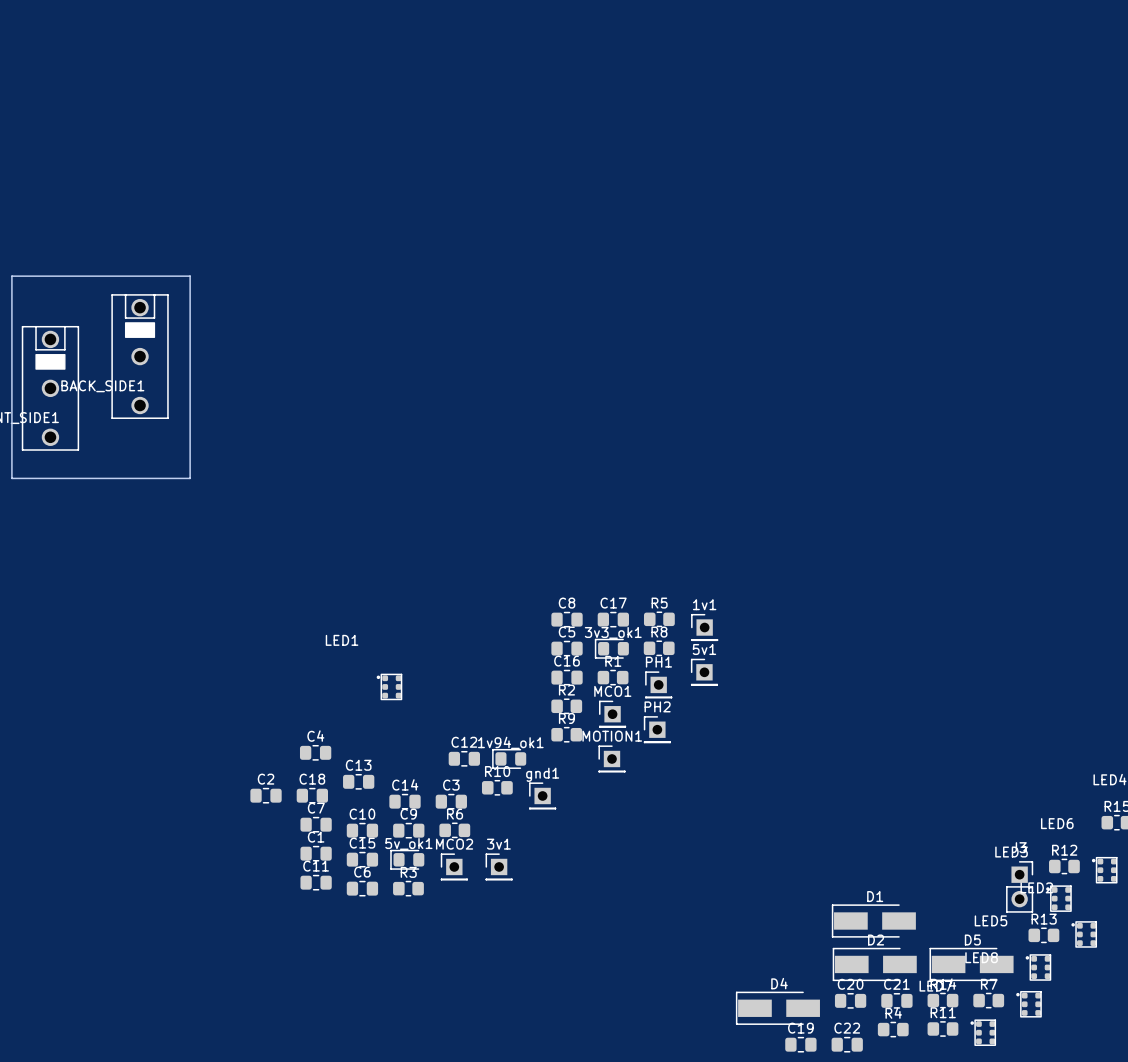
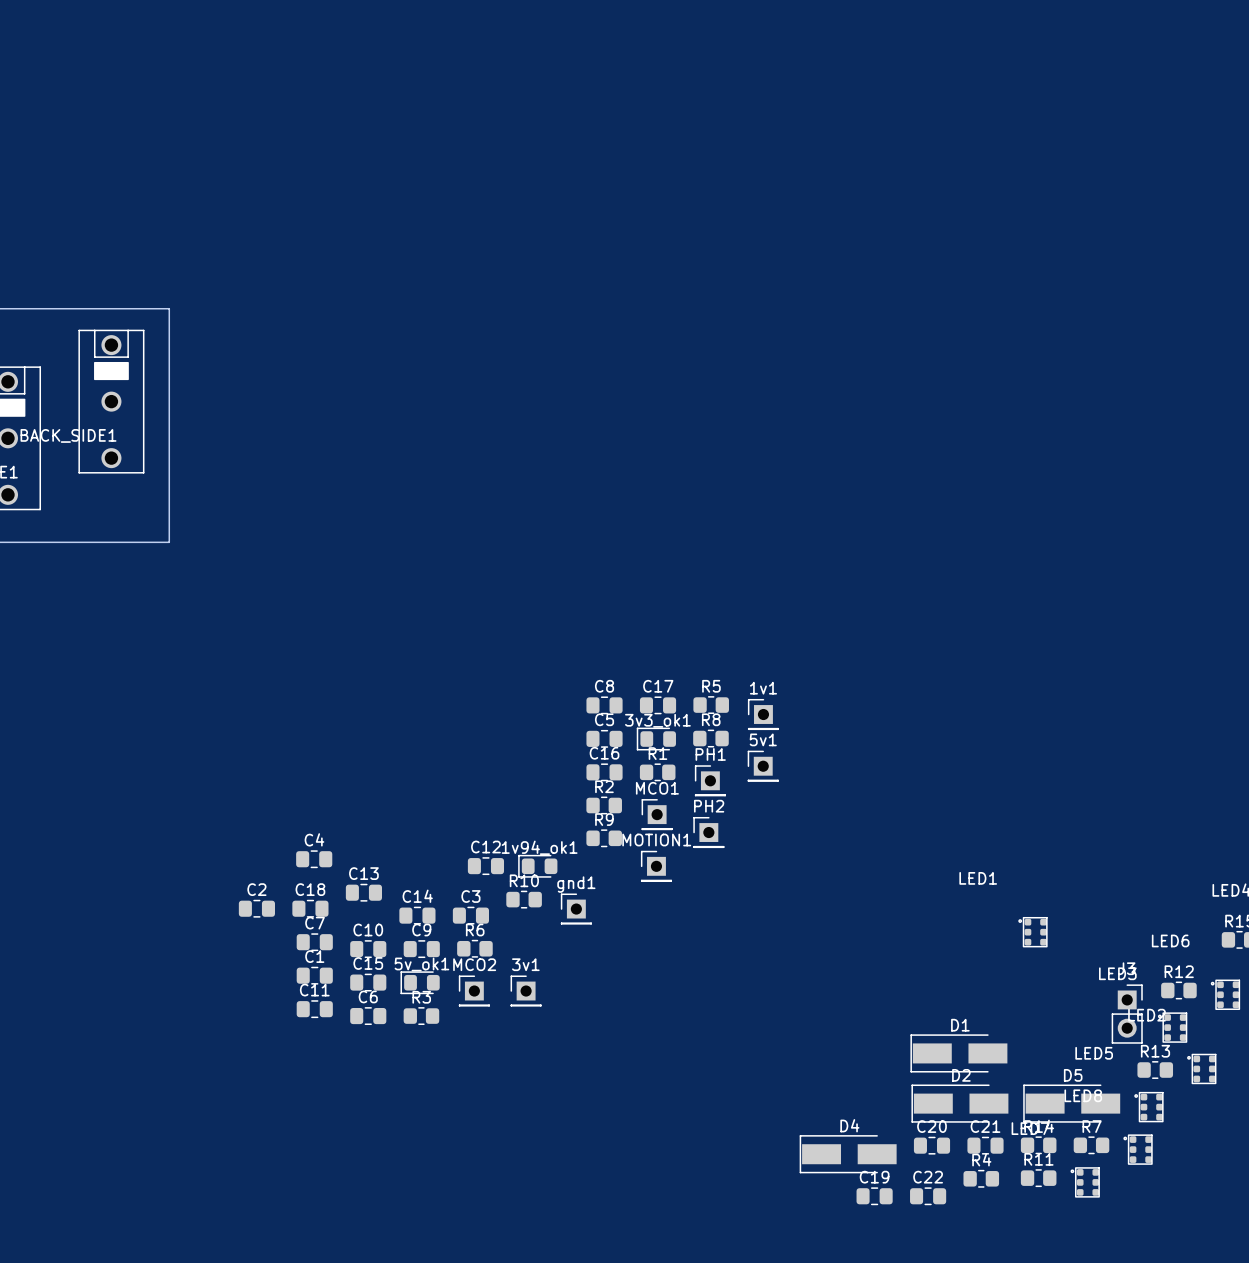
LED1 position: (389, 686) -> (1032, 932)

